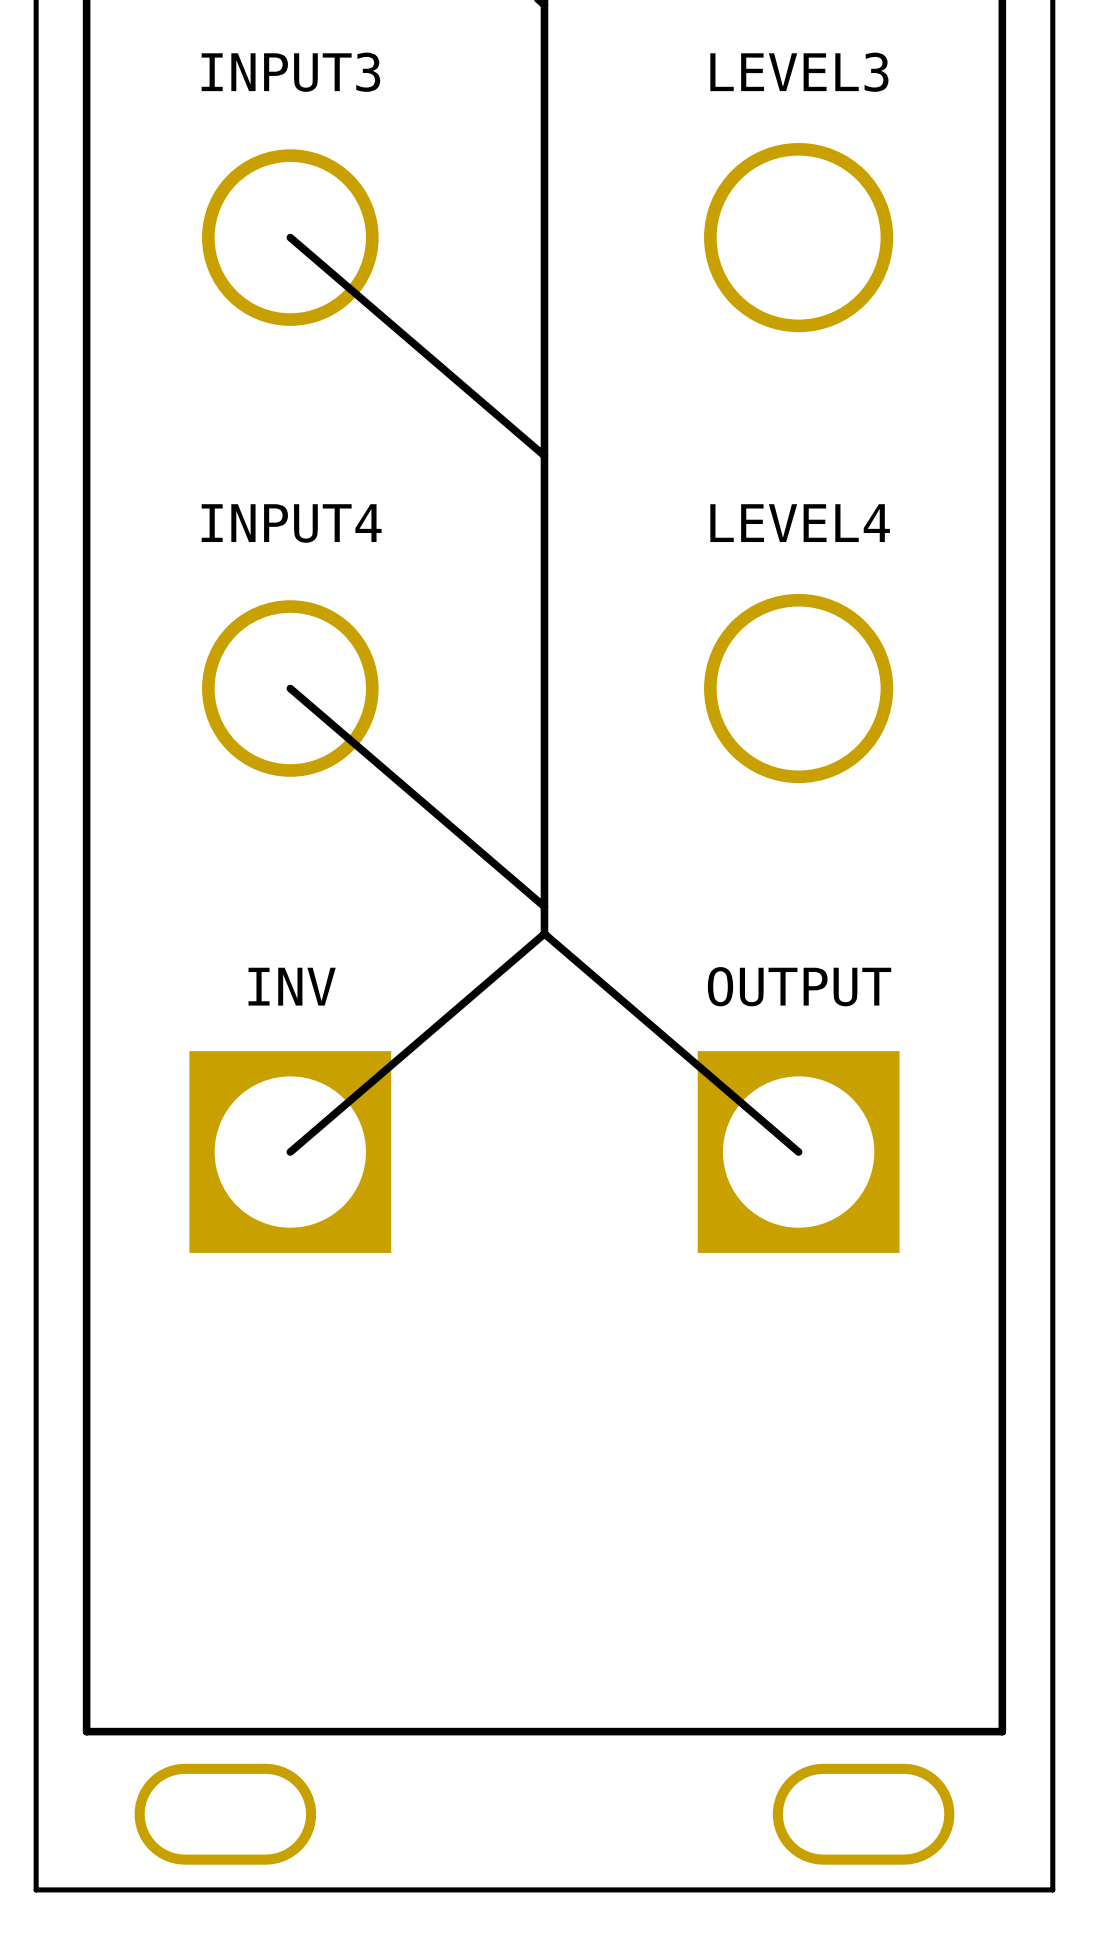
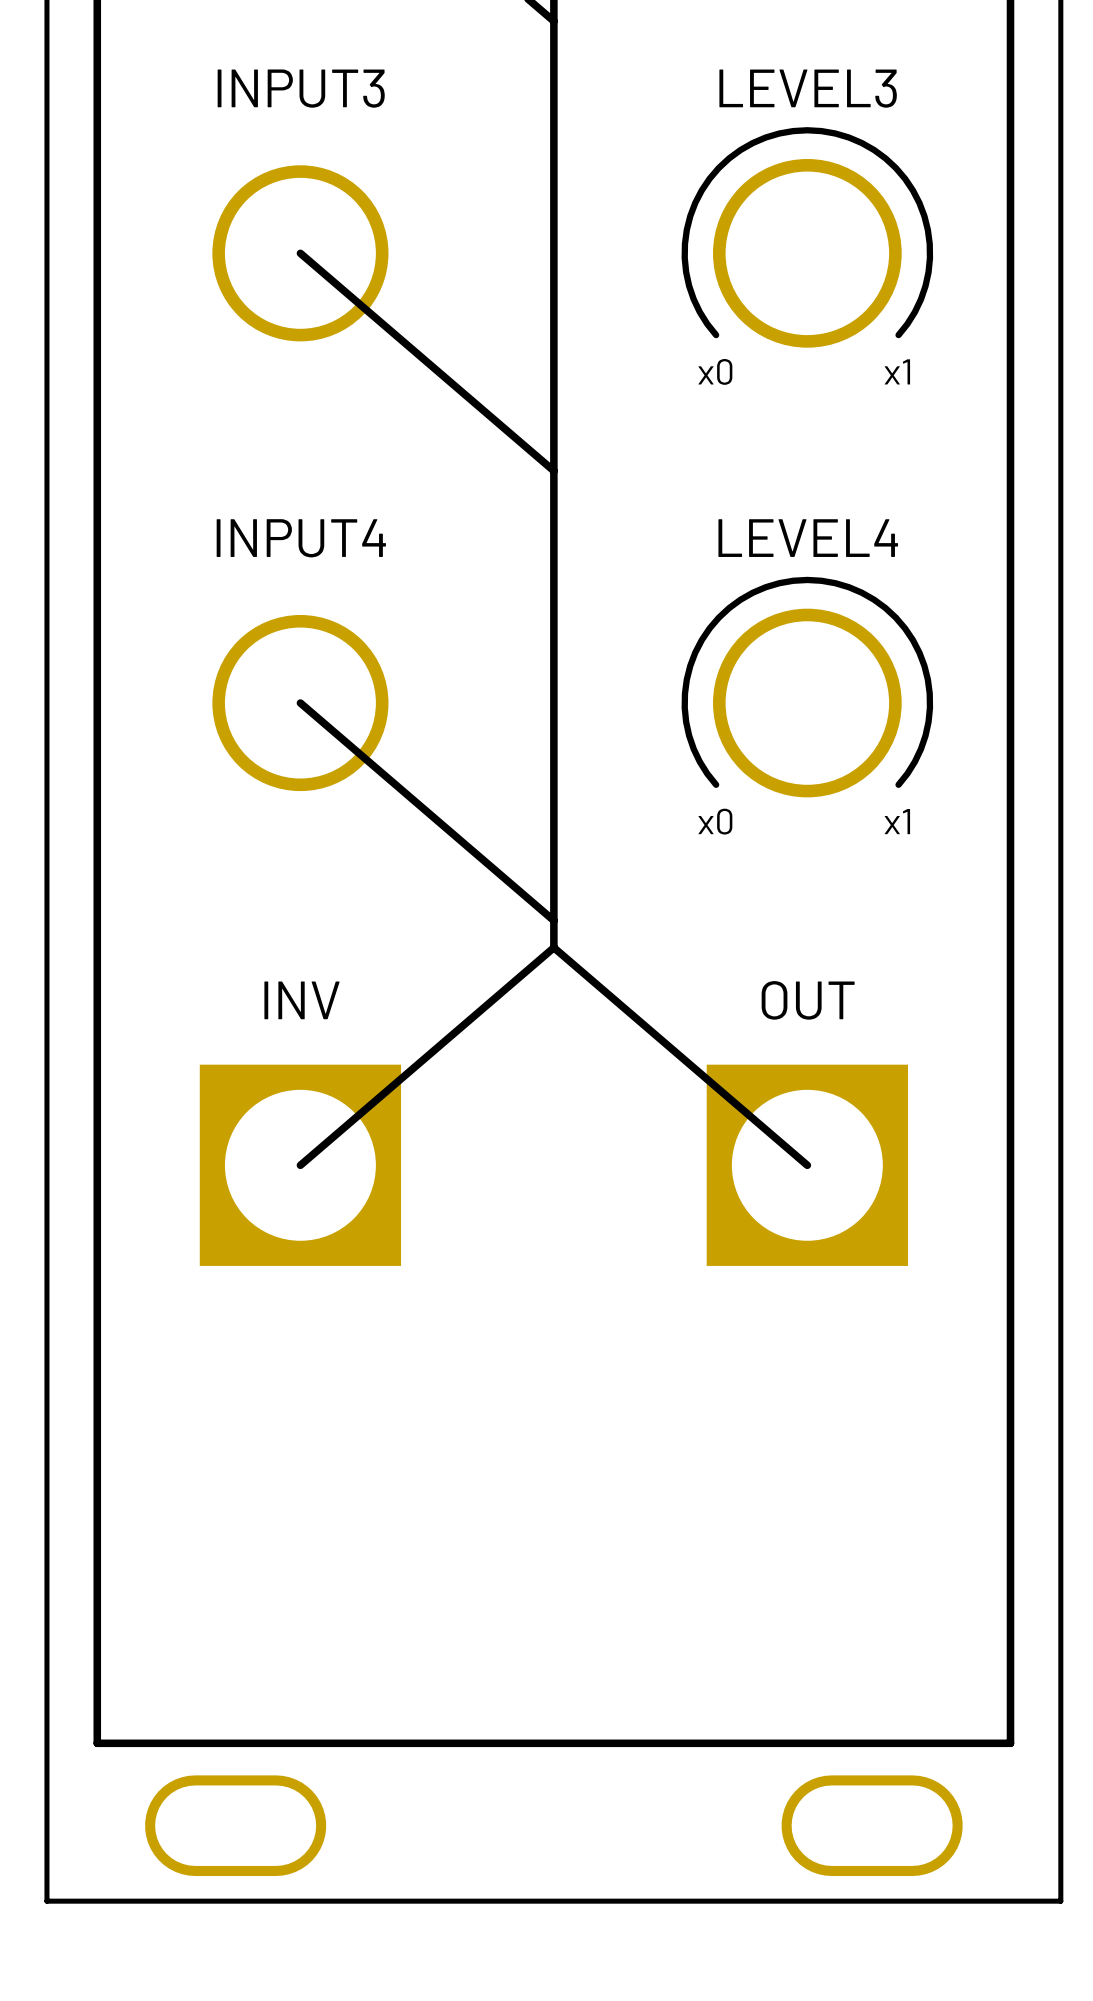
line: none -> (716, 335) (707, 324) (693, 299) (686, 272) (684, 258) (686, 229) (695, 203) (701, 190) (718, 168) (740, 150) (752, 143) (779, 133) (807, 130) (835, 133) (848, 137) (874, 150) (895, 168) (912, 190) (919, 203) (927, 229) (929, 243) (928, 272) (920, 299) (914, 312) (898, 335)
text: none -> x0 (715, 371)
text: none -> x1 (897, 371)
line: none -> (716, 784) (707, 773) (693, 749) (686, 721) (684, 707) (686, 679) (695, 652) (709, 628) (718, 617) (740, 599) (752, 592) (779, 583) (807, 579) (835, 583) (861, 592) (874, 599) (895, 617) (905, 628) (919, 652) (927, 679) (929, 693) (928, 721) (920, 749) (914, 761) (898, 784)
text: none -> x0 (715, 821)
text: none -> x1 (897, 821)
OUTPUT name: OUTPUT (799, 986) -> OUT (808, 1000)

